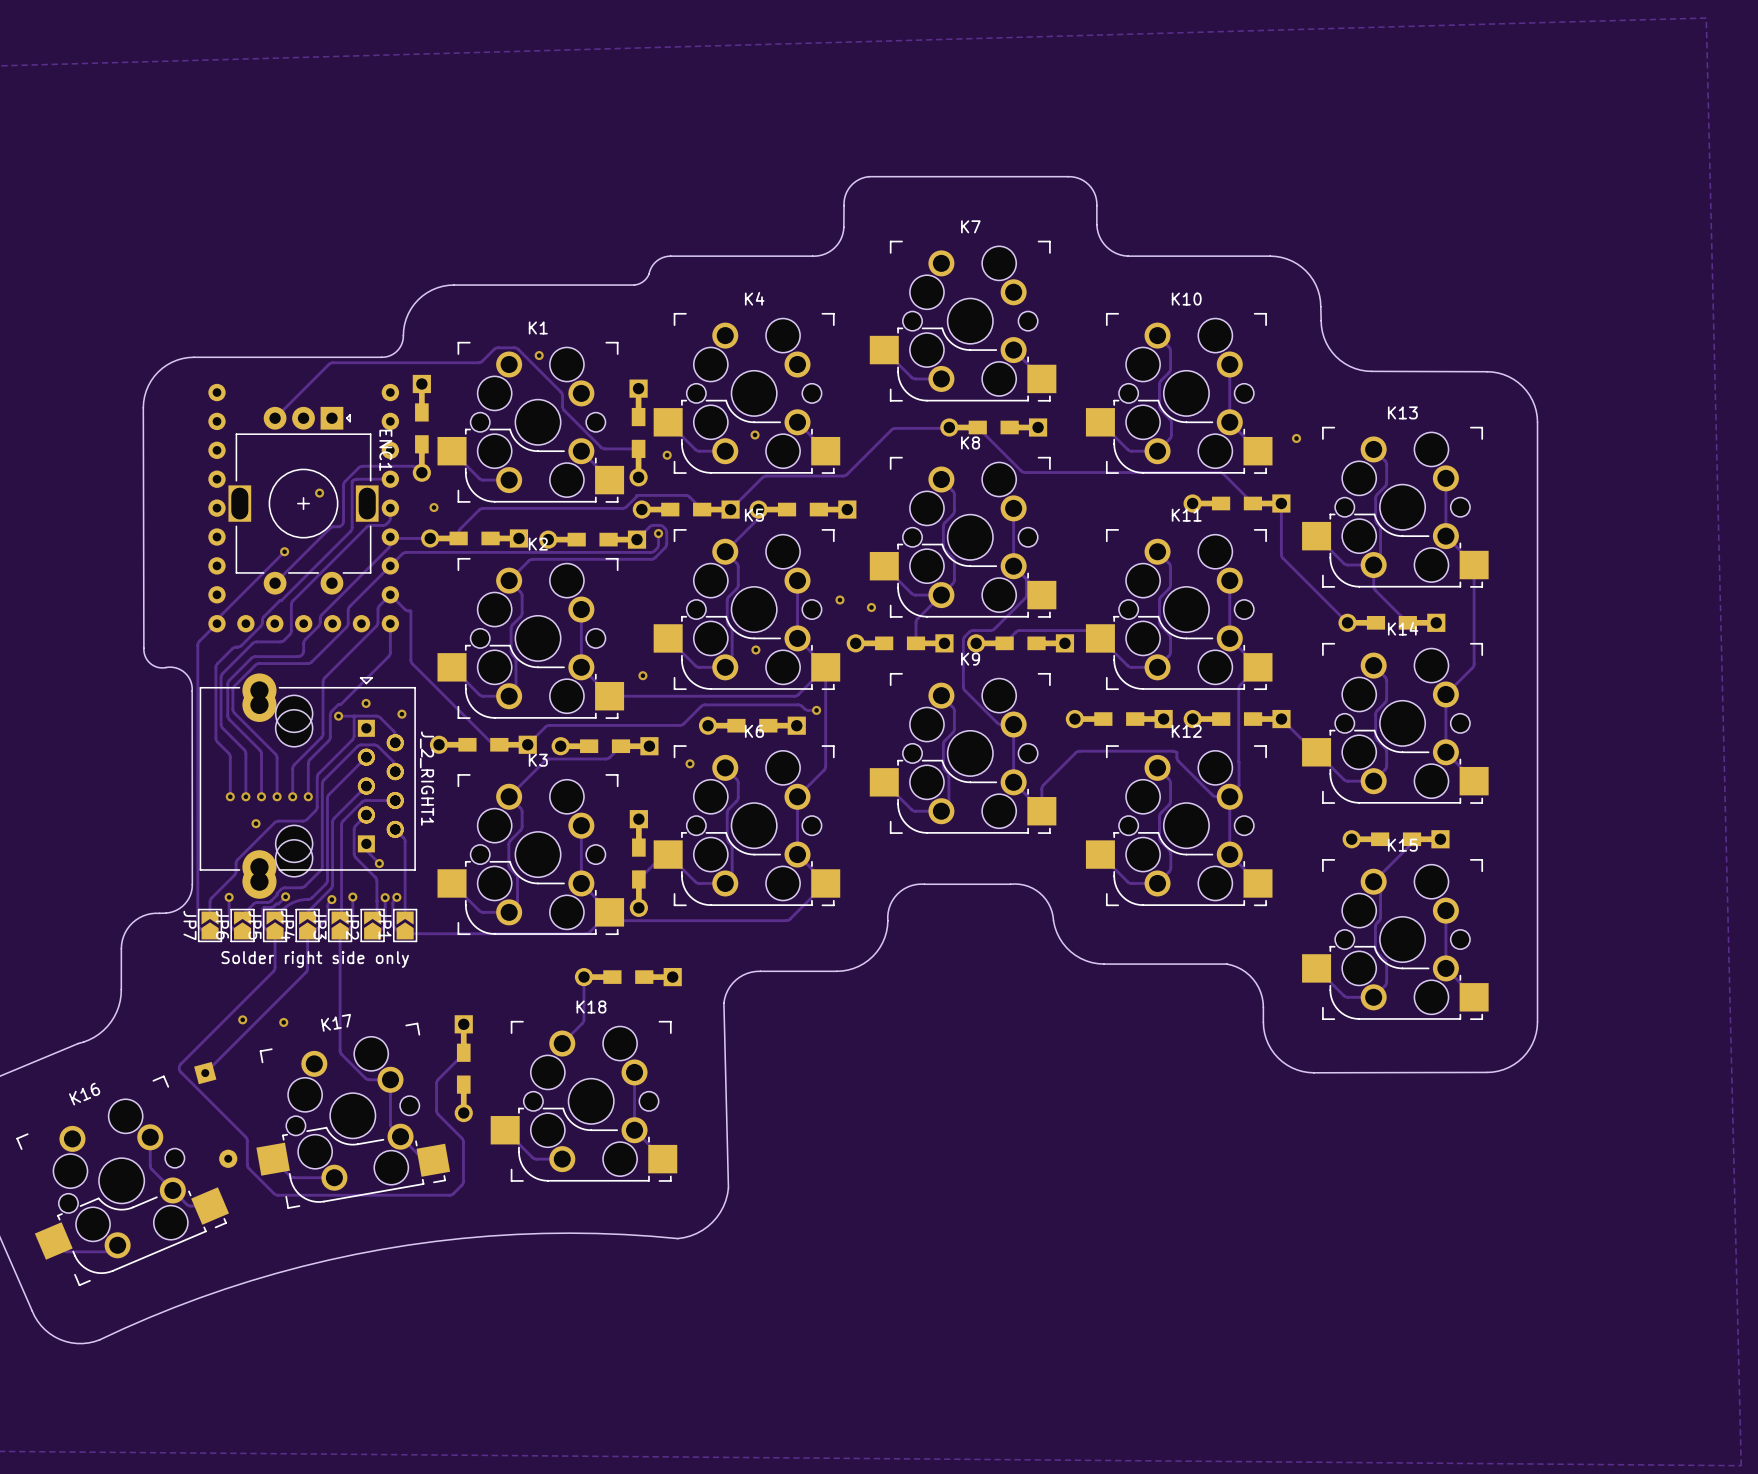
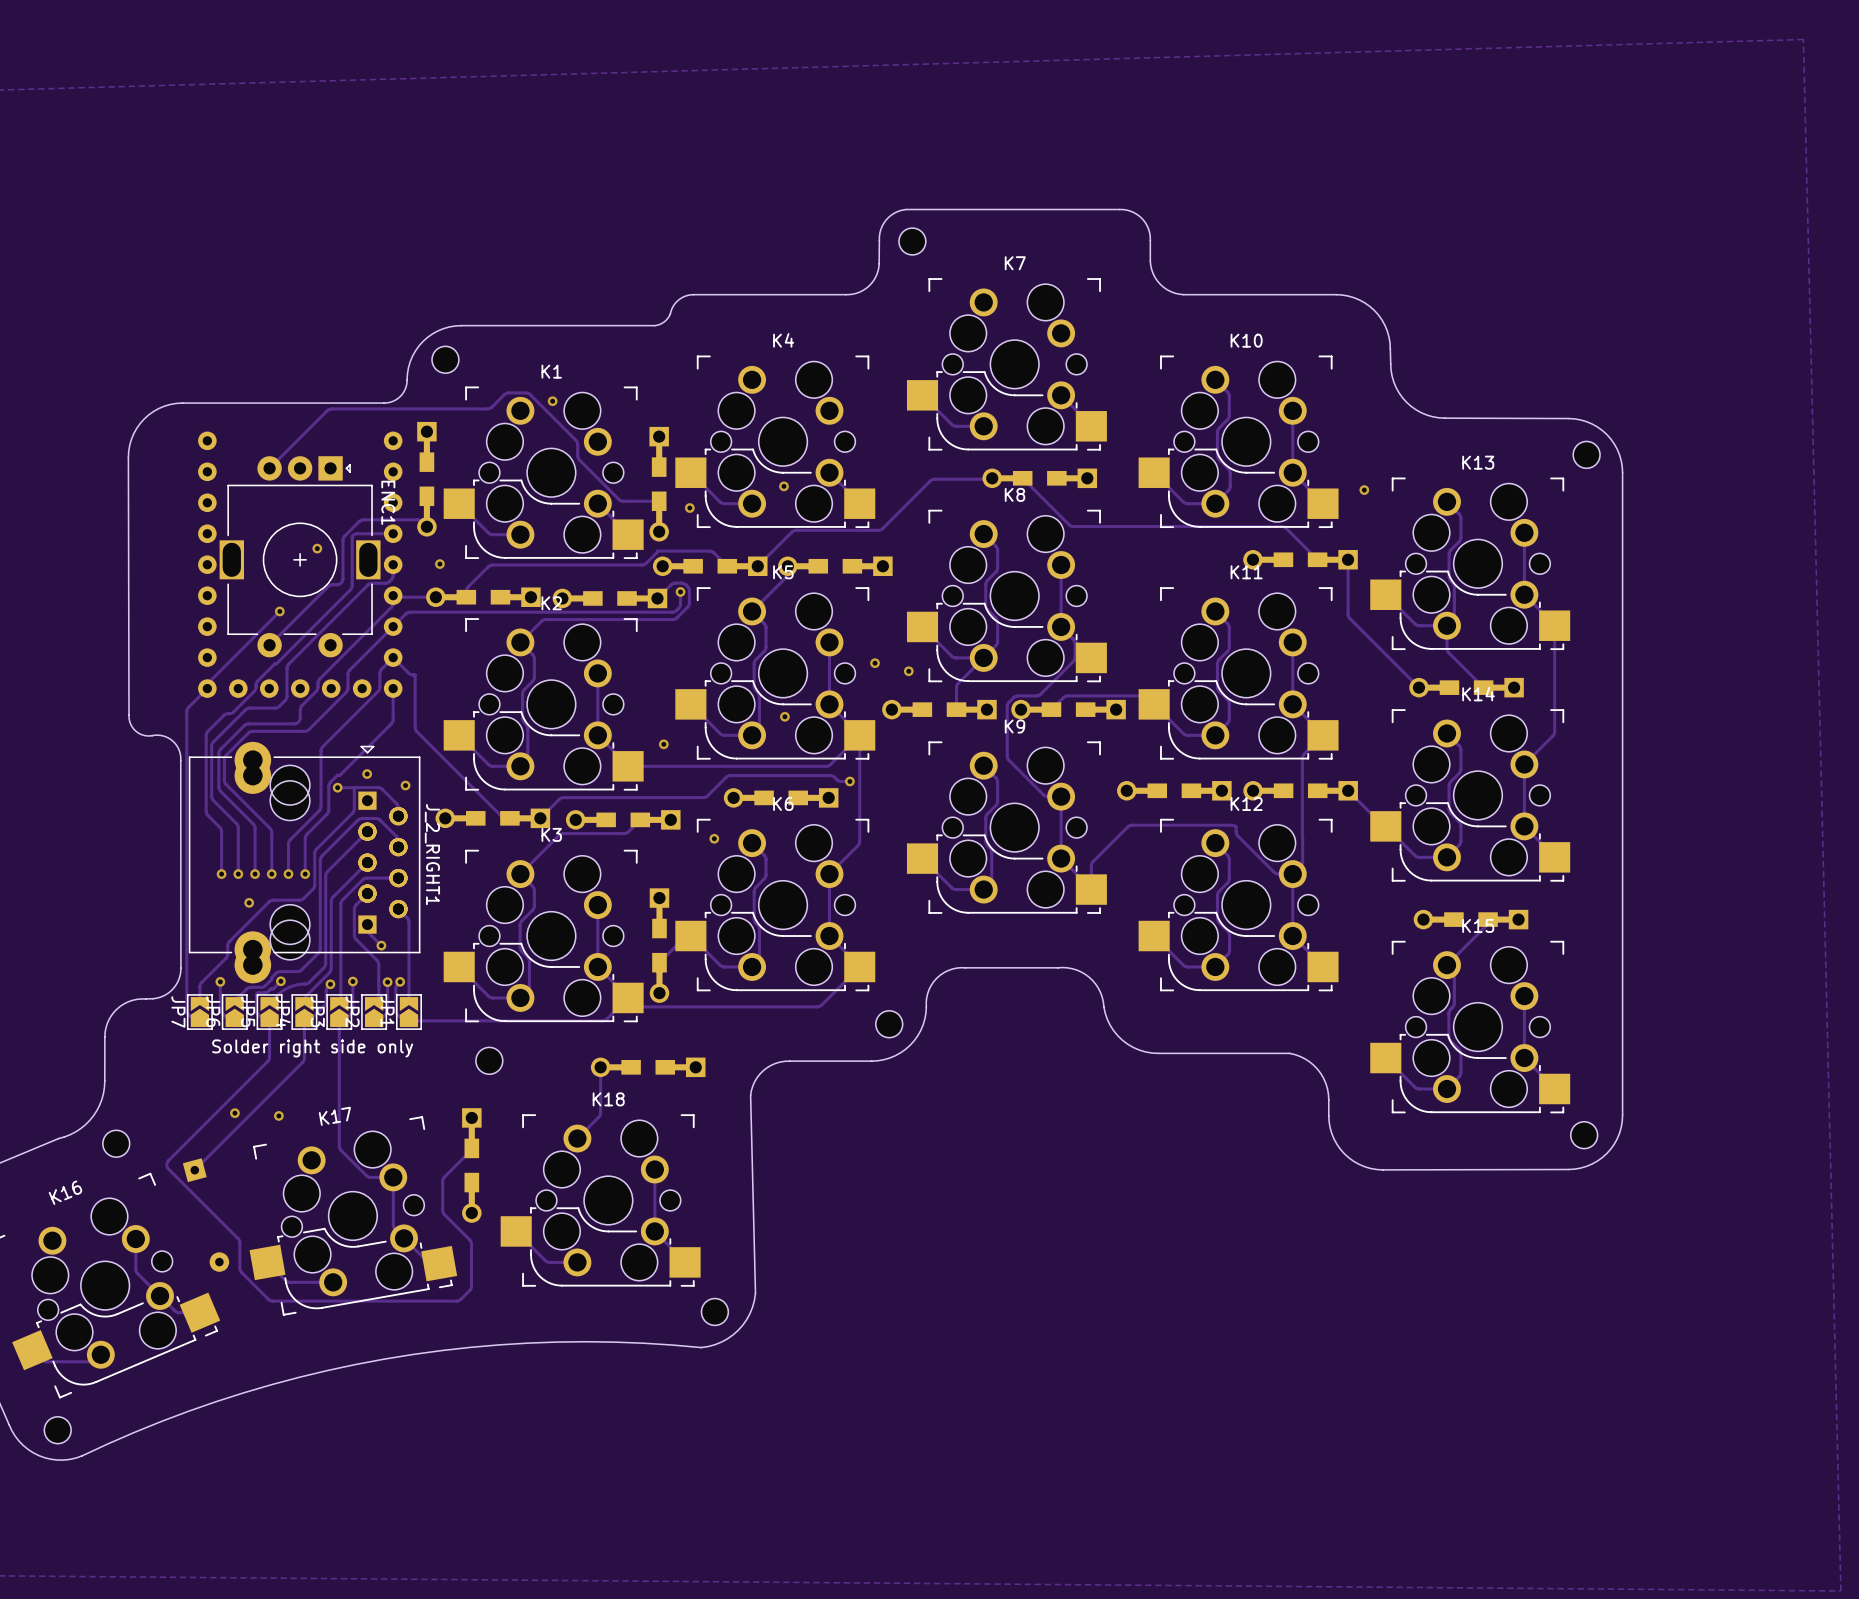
part: none -> (912, 241)
part: none -> (445, 359)
part: none -> (1586, 454)
part: none -> (889, 1024)
part: none -> (489, 1060)
part: none -> (1584, 1135)
part: none -> (116, 1143)
part: none -> (714, 1311)
part: none -> (57, 1430)

